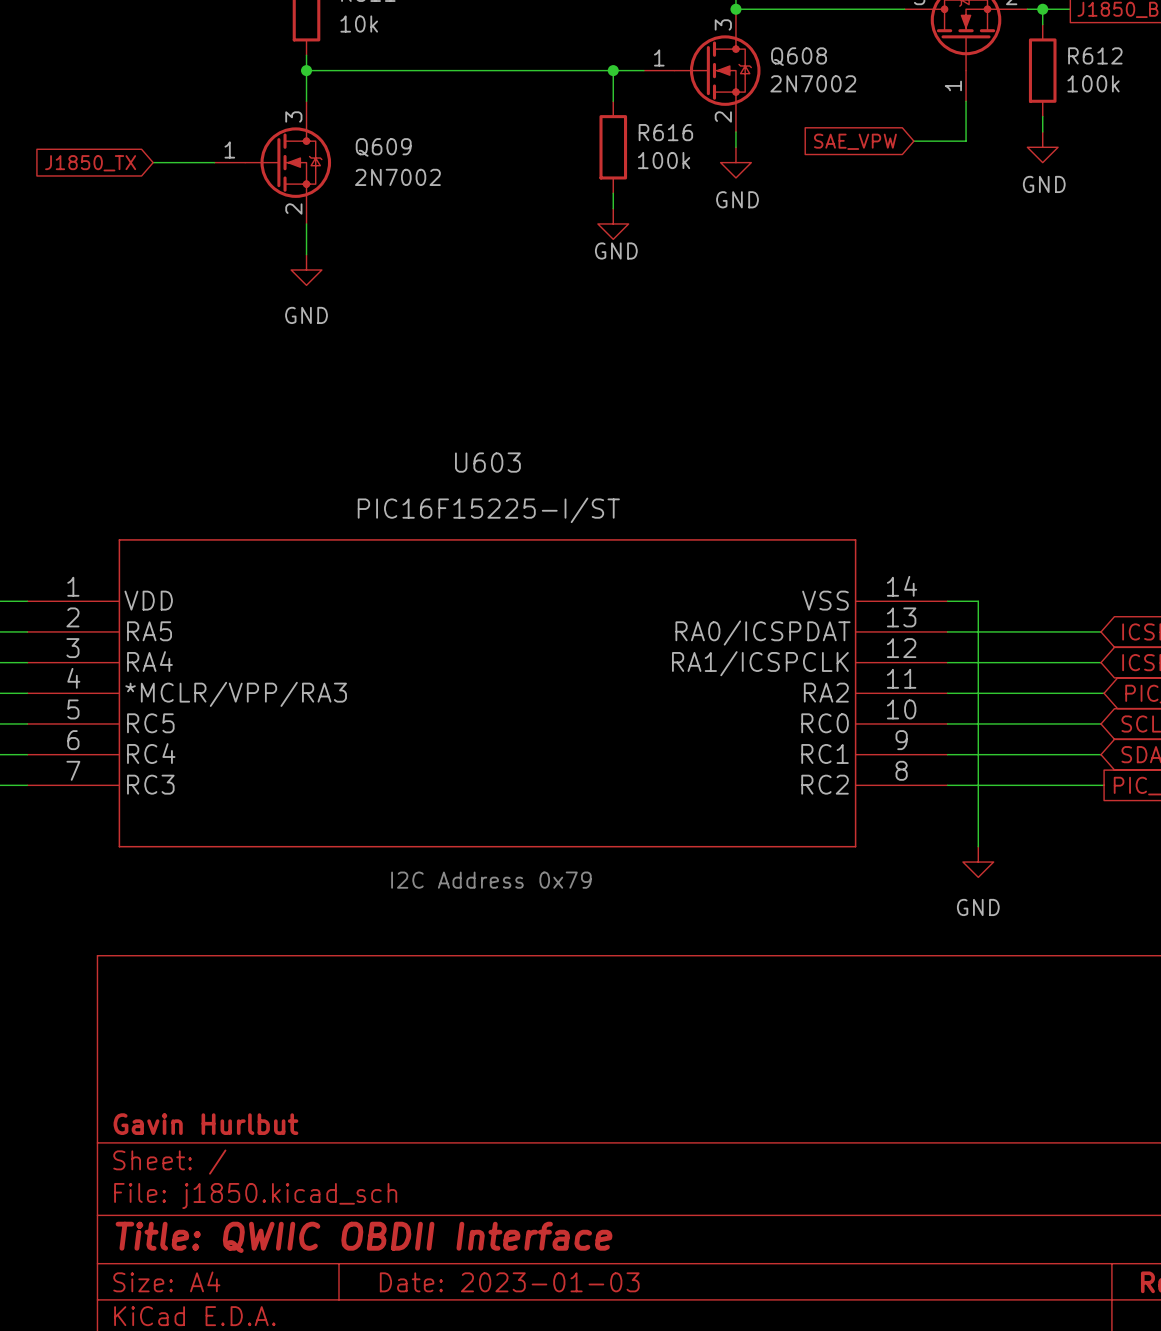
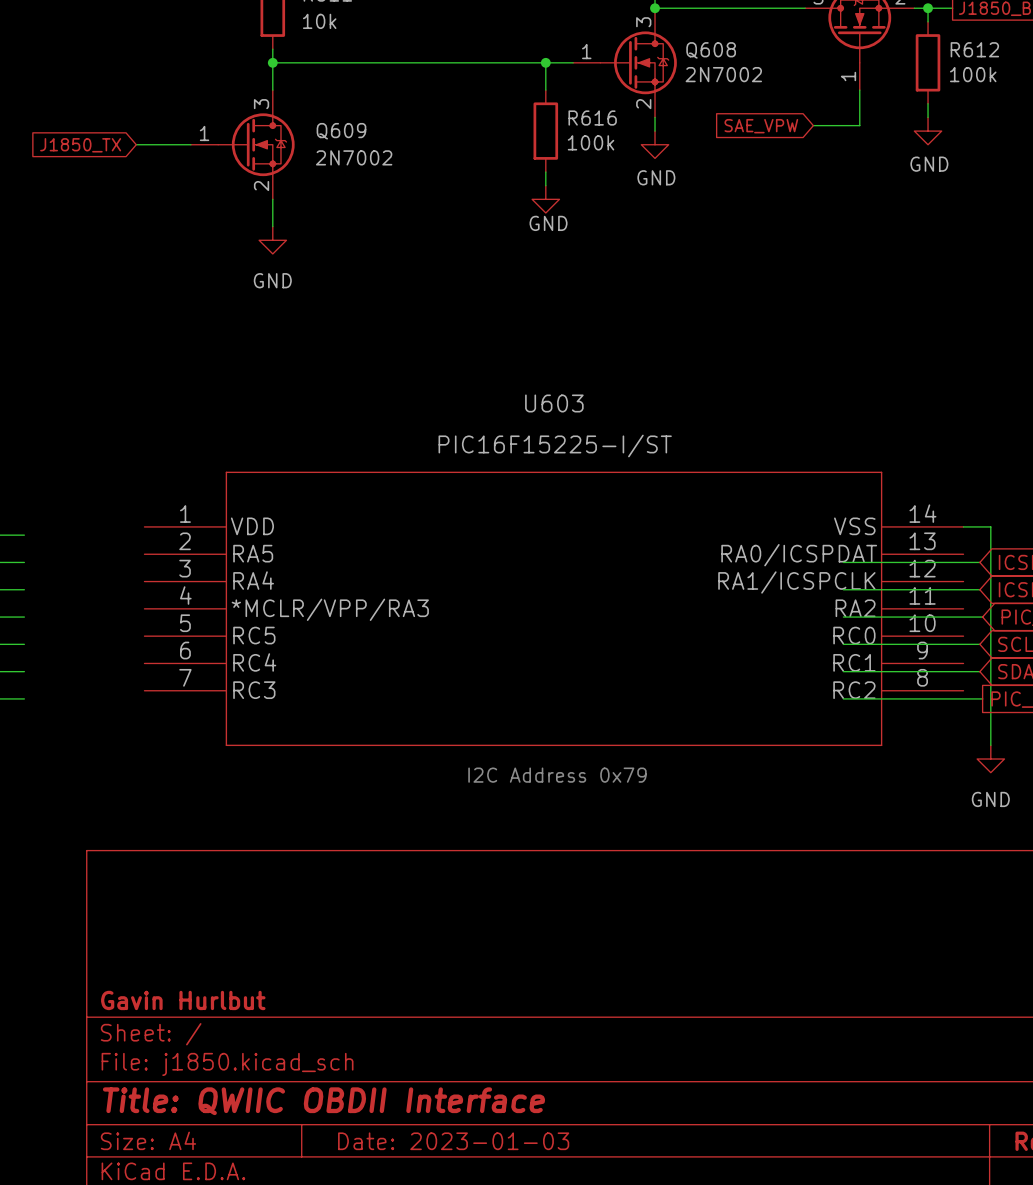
wire: (947, 601) (978, 601) (978, 846) -> (963, 526) (990, 526) (990, 745)
U603 position: (487, 693) -> (553, 608)
power symbol position: GND (978, 862) -> GND (990, 759)
text position: I2C Address 0x79 (491, 880) -> I2C Address 0x79 (557, 775)

